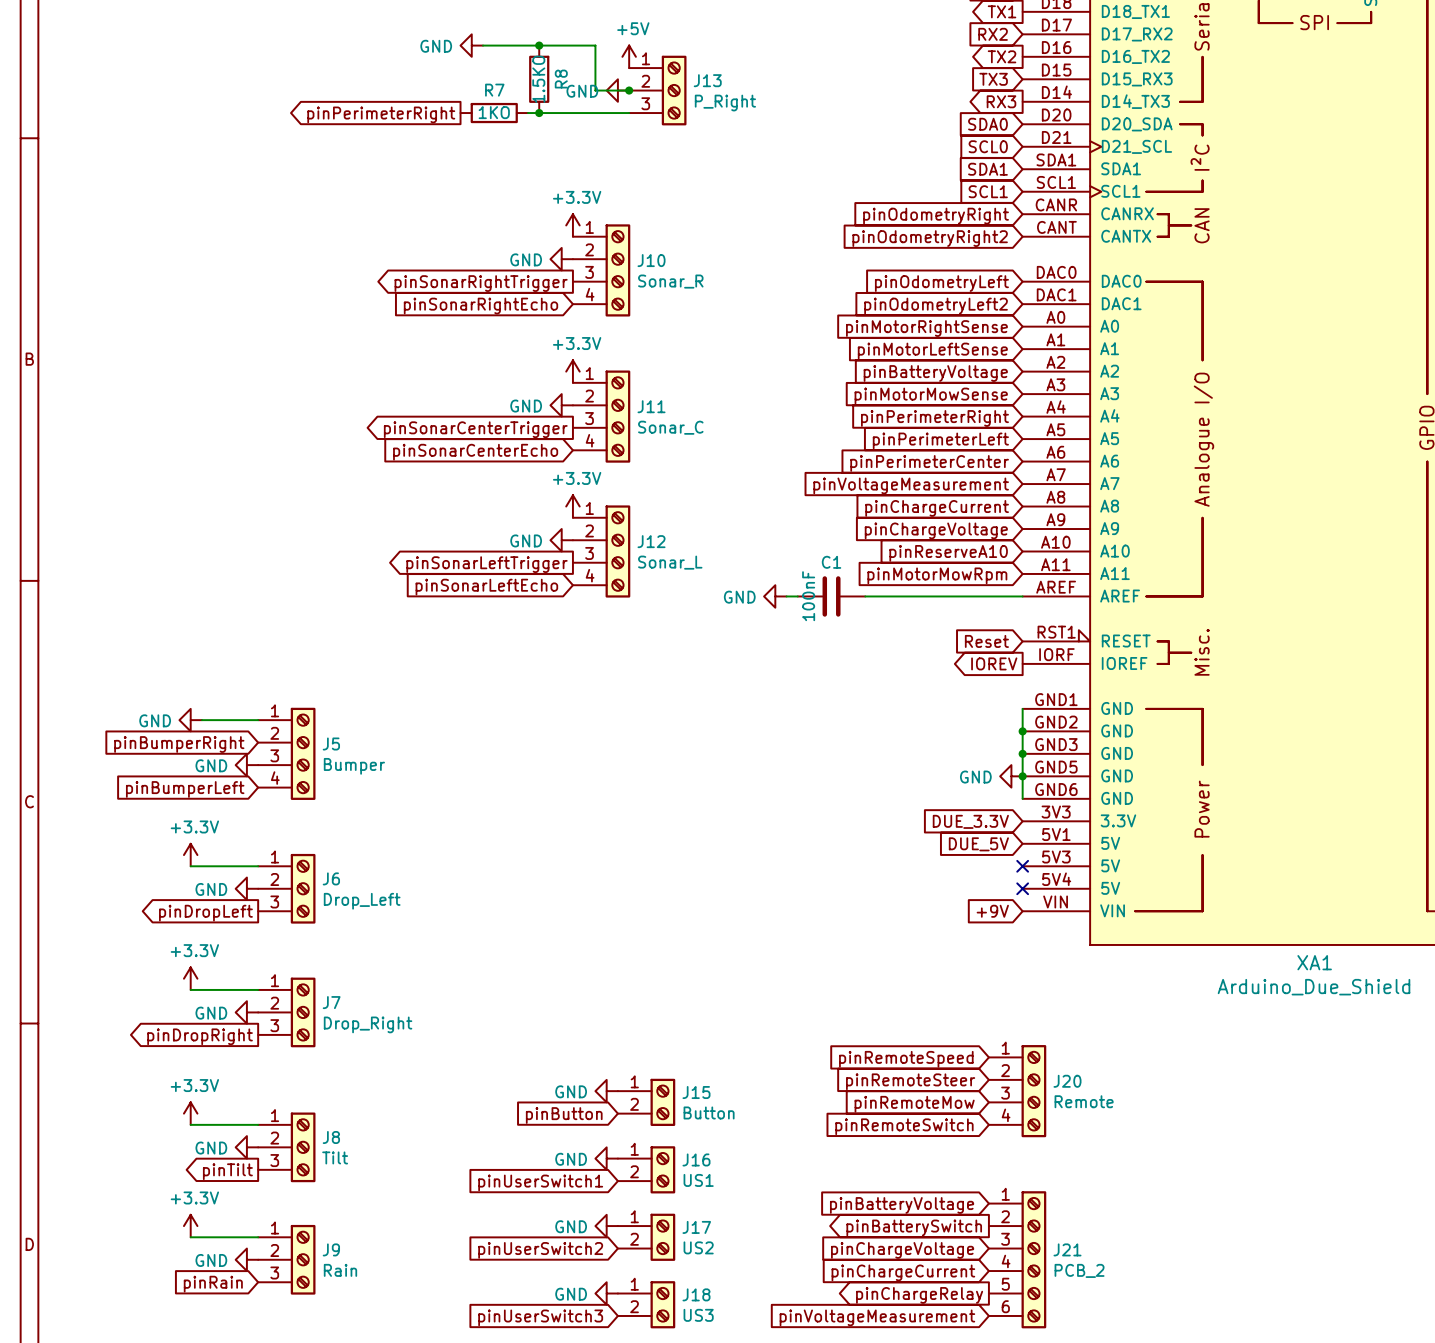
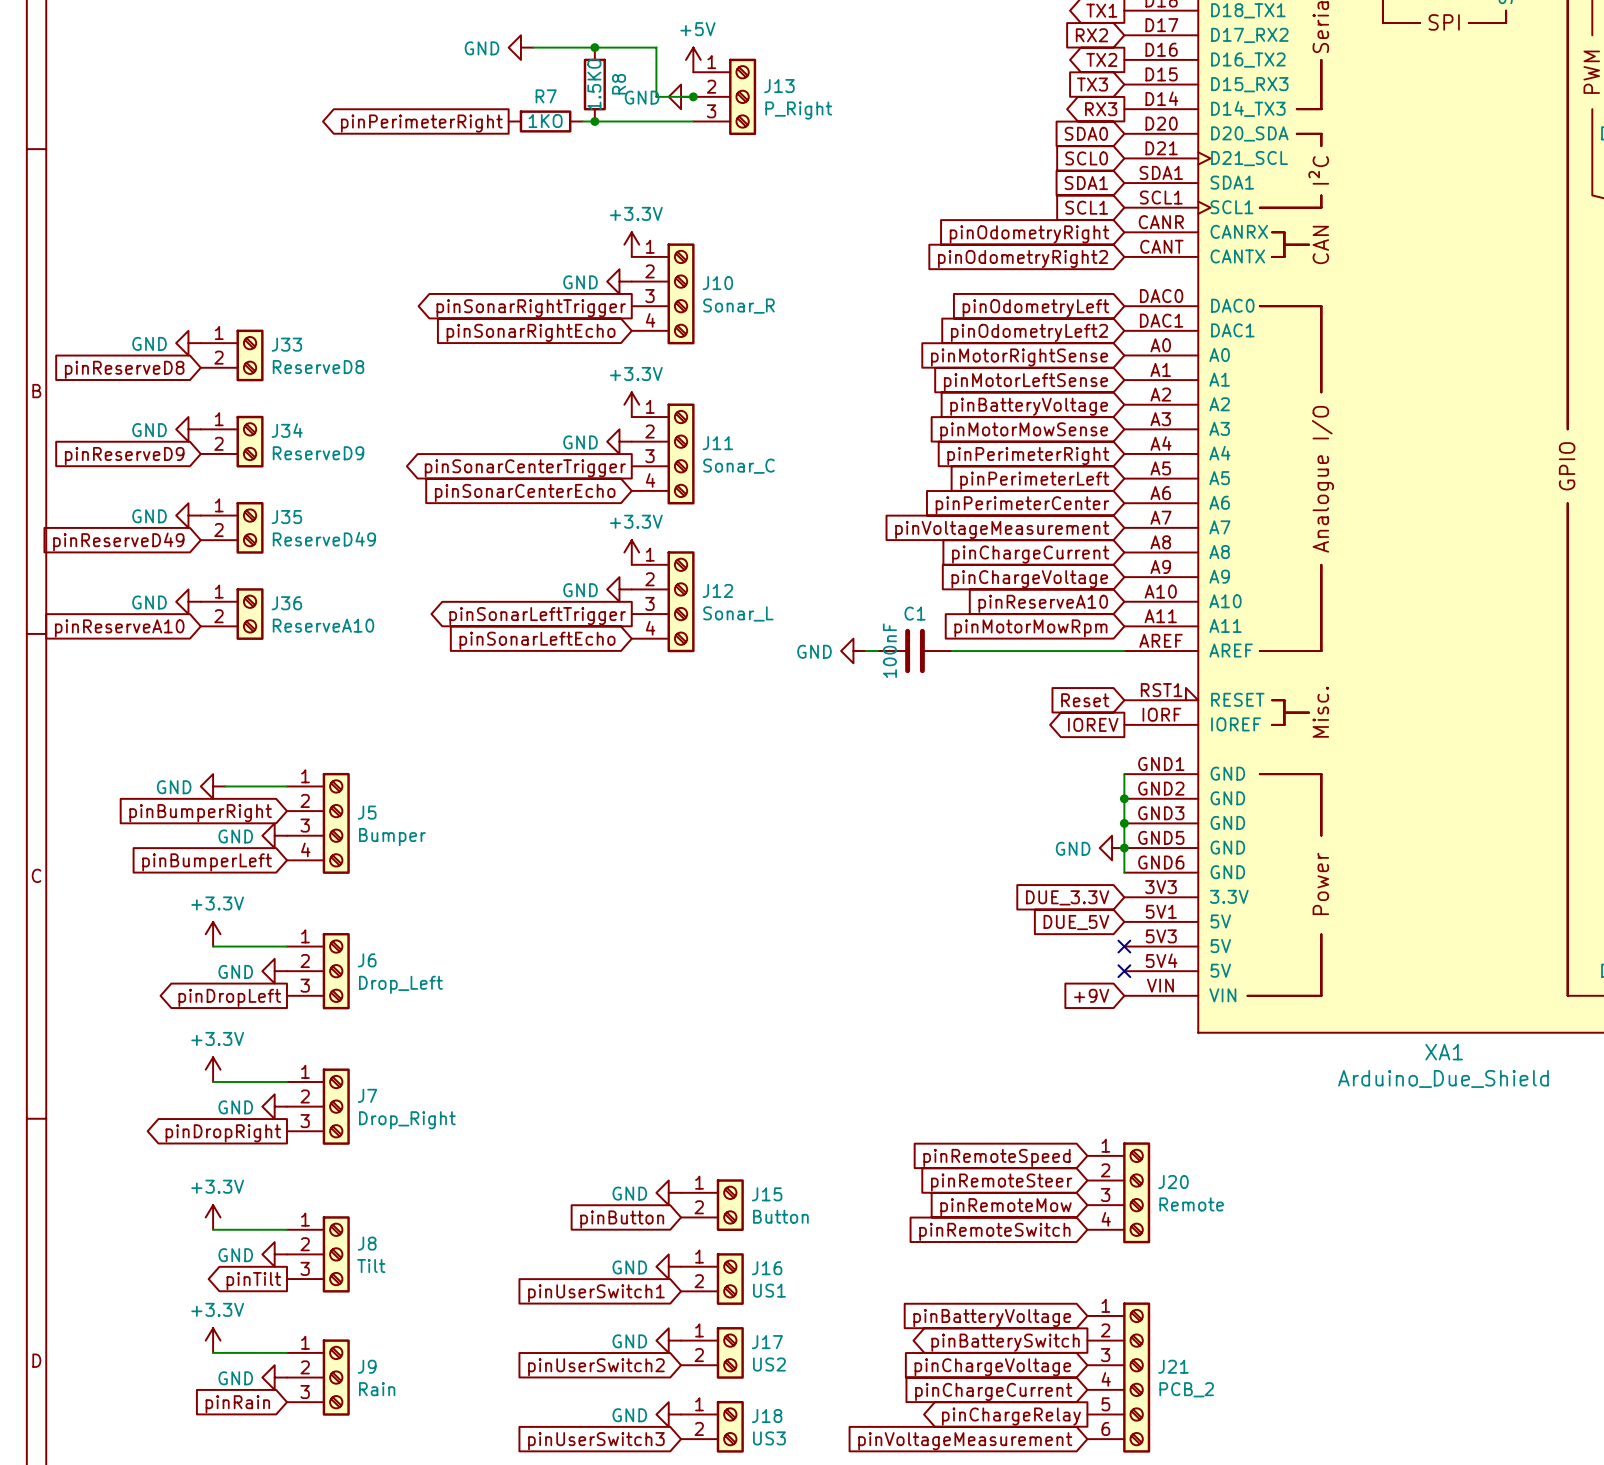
power symbol: none -> GND (188, 343)
J33: none -> ReserveD8 (232, 355)
global label: none -> pinReserveD8 (124, 369)
power symbol: none -> GND (188, 429)
J34: none -> ReserveD9 (232, 441)
global label: none -> pinReserveD9 (124, 456)
power symbol: none -> GND (188, 515)
J35: none -> ReserveD49 (232, 527)
global label: none -> pinReserveD49 (118, 541)
power symbol: none -> GND (188, 601)
J36: none -> ReserveA10 (232, 614)
global label: none -> pinReserveA10 (119, 628)

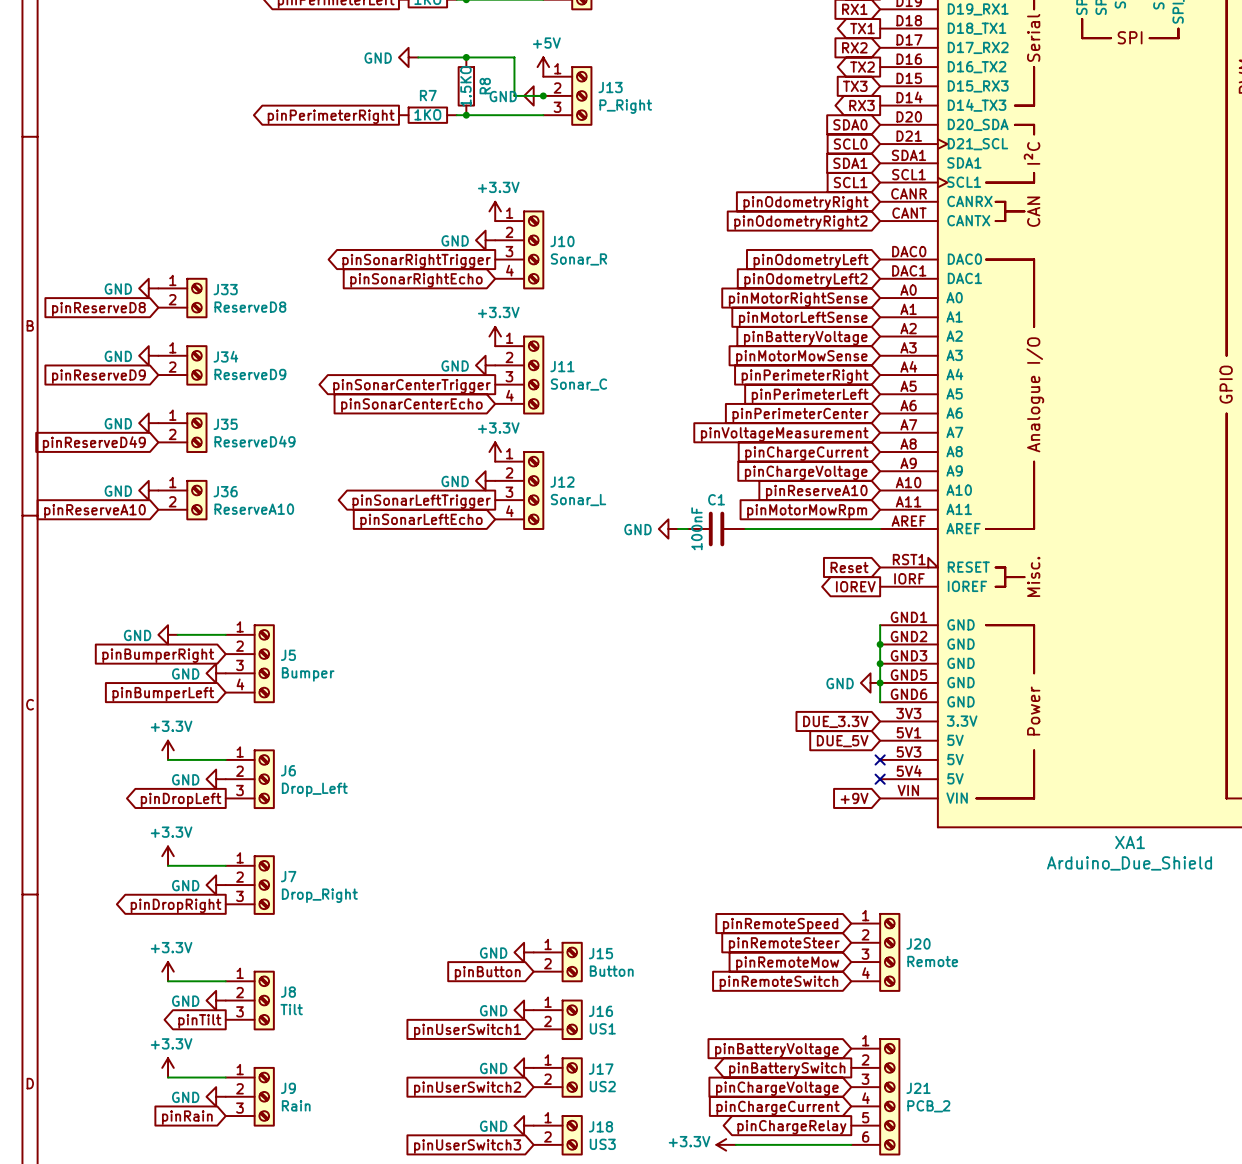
power symbol: none -> +3.3V (726, 1144)
wire: none -> (735, 1144) (851, 1144)
global label: pinVoltageMeasurement (965, 1441) -> none

